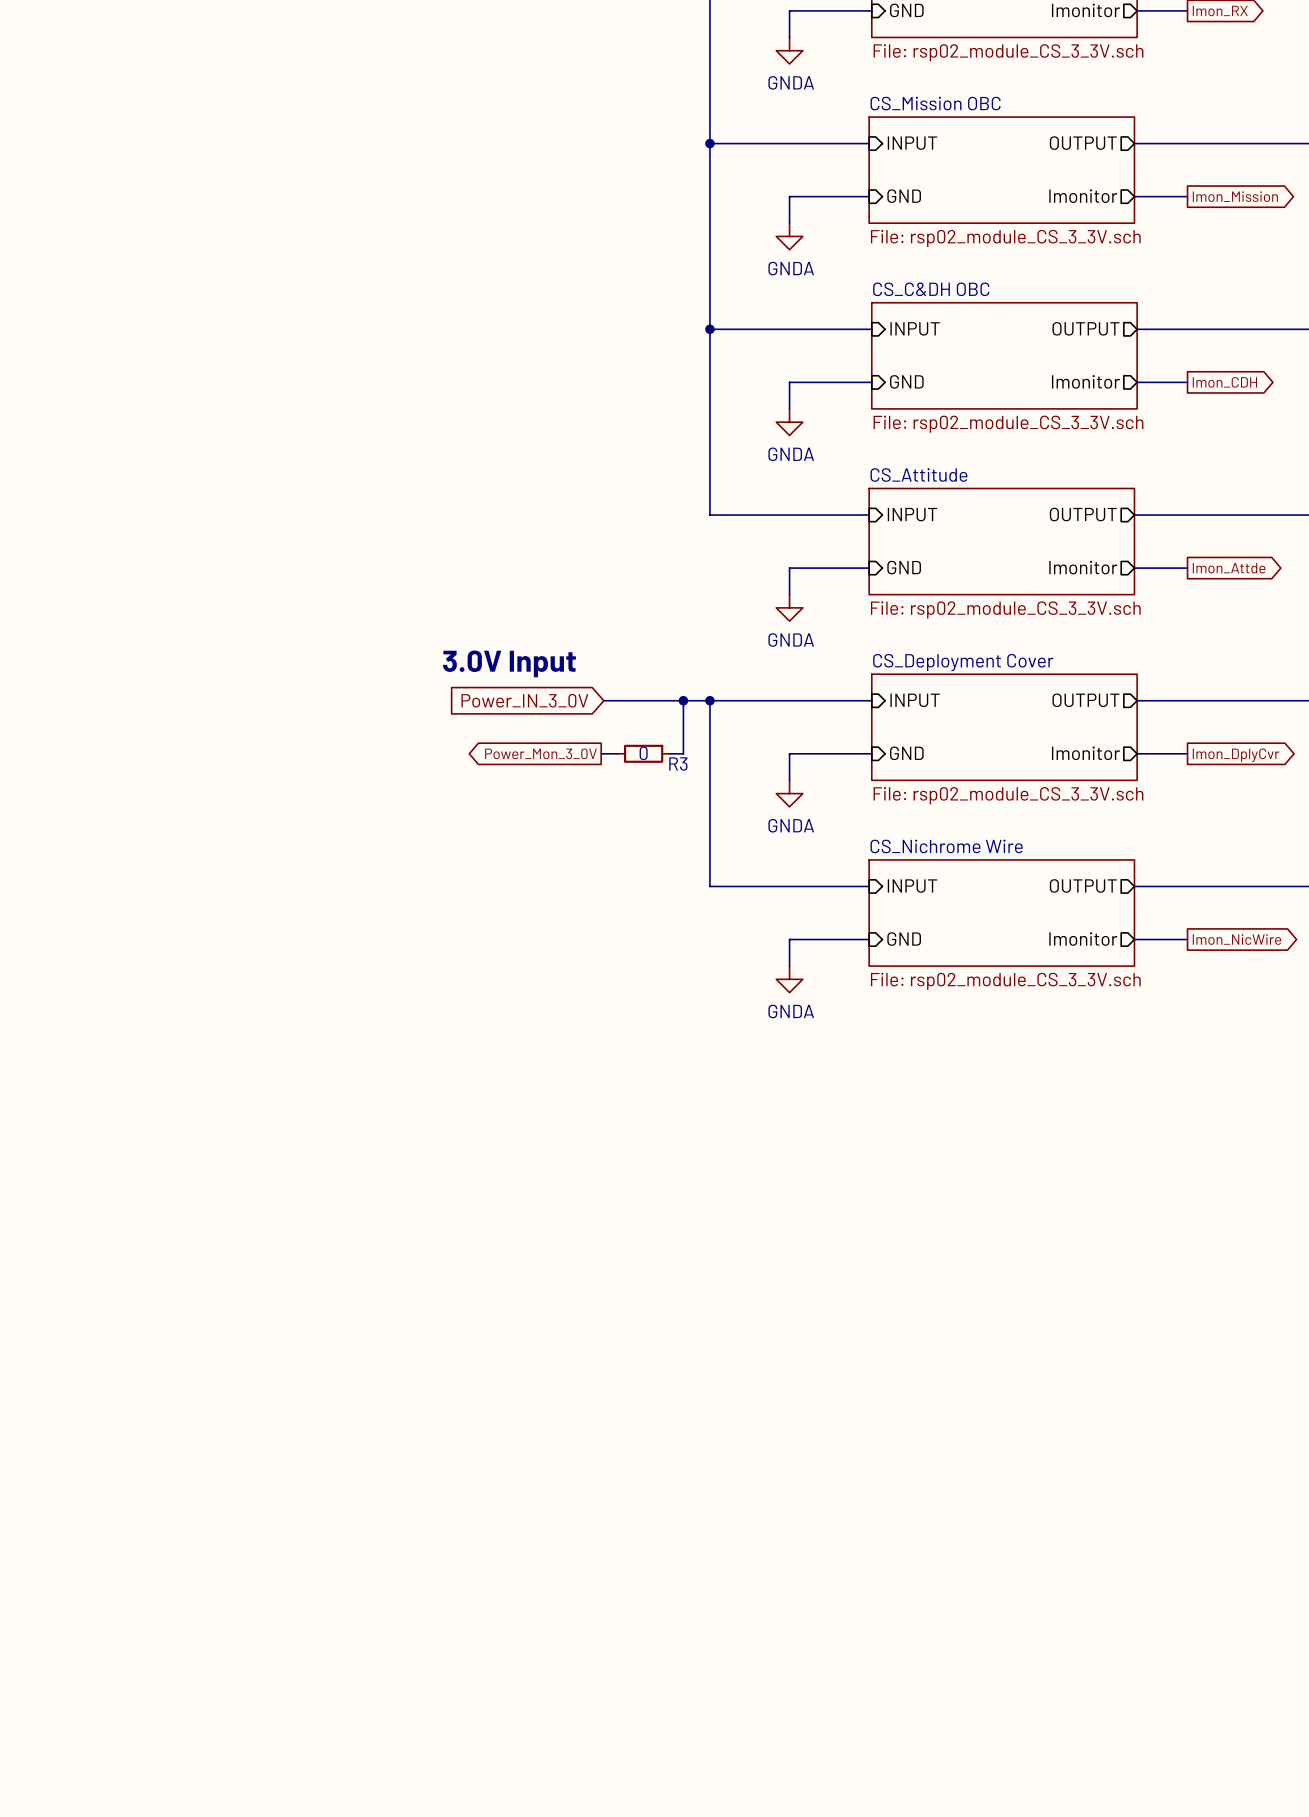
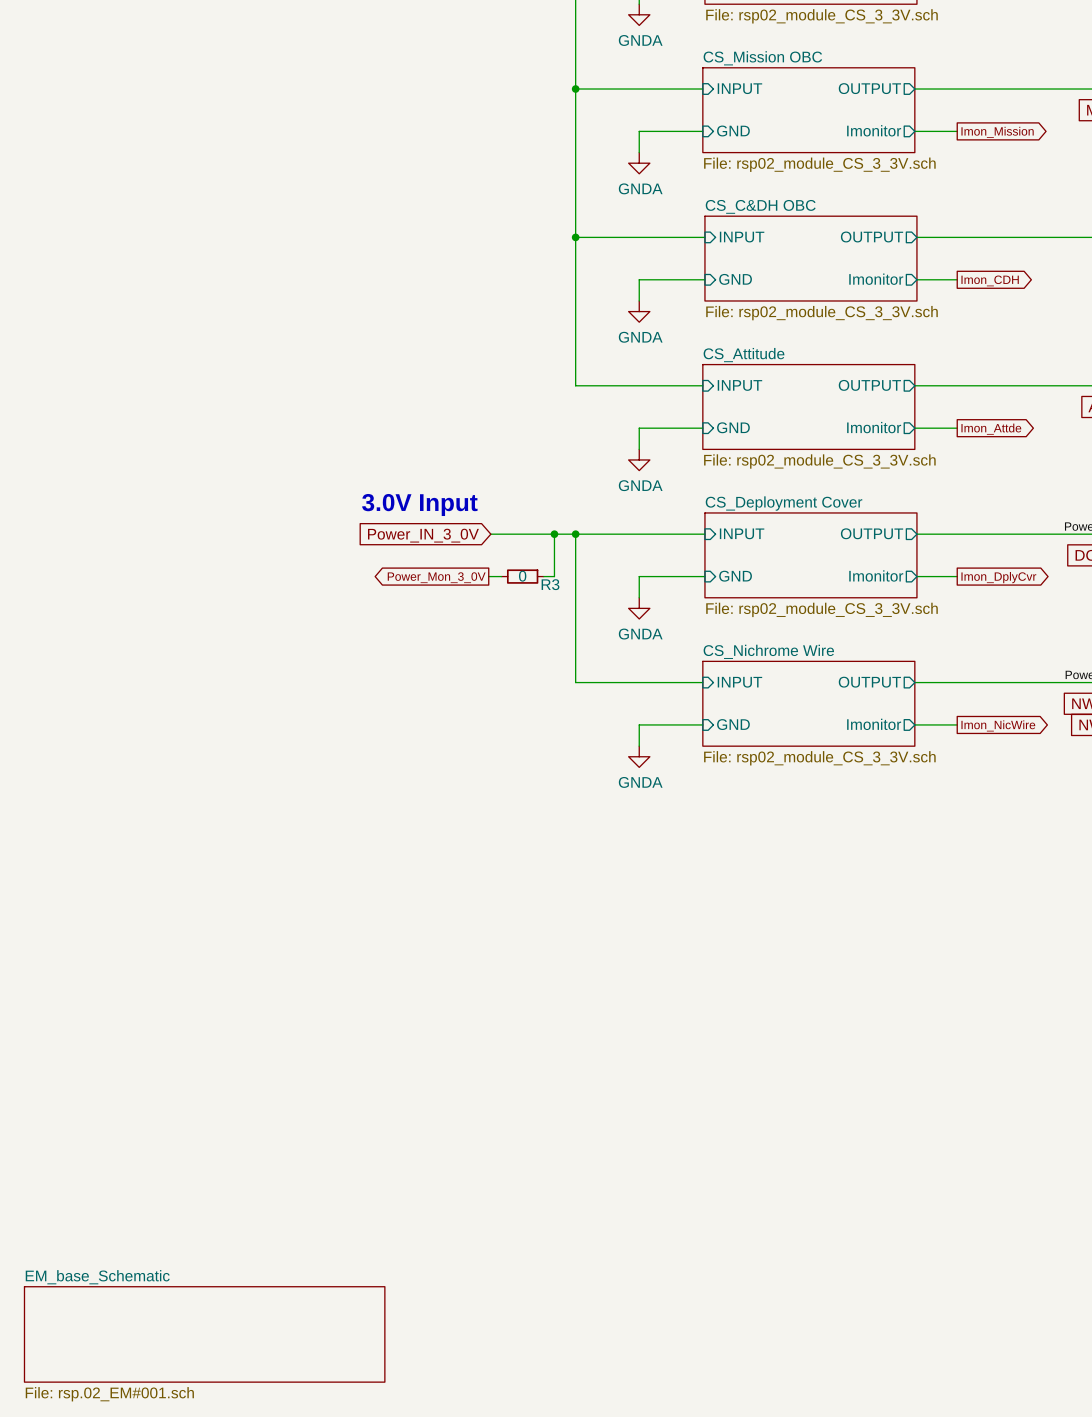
sheet EM_base_Schematic: none -> File: rsp.02_EM#001.sch (204, 1334)

